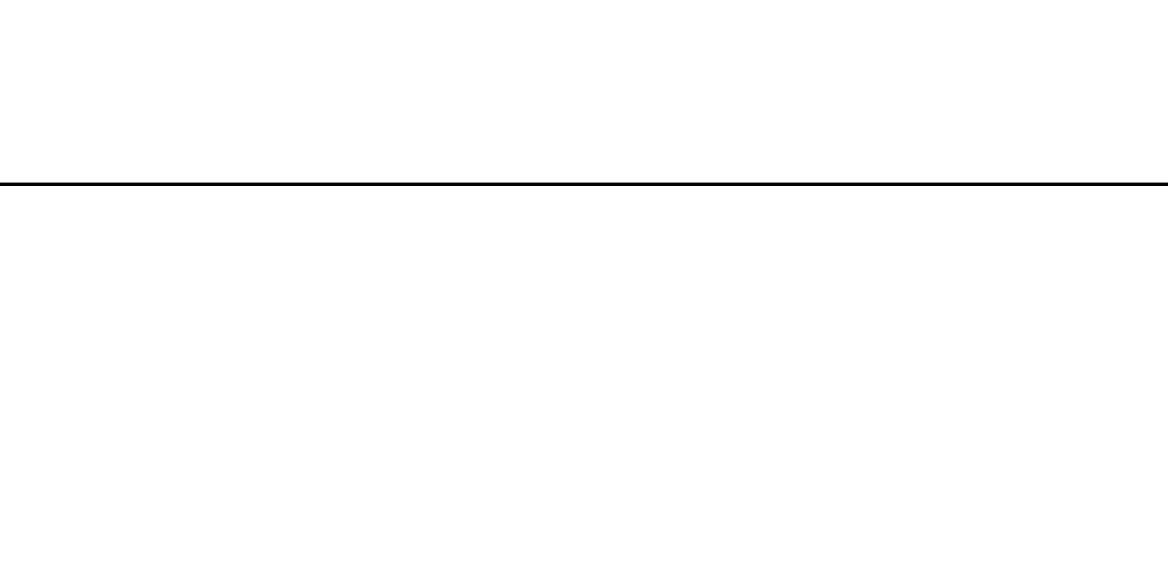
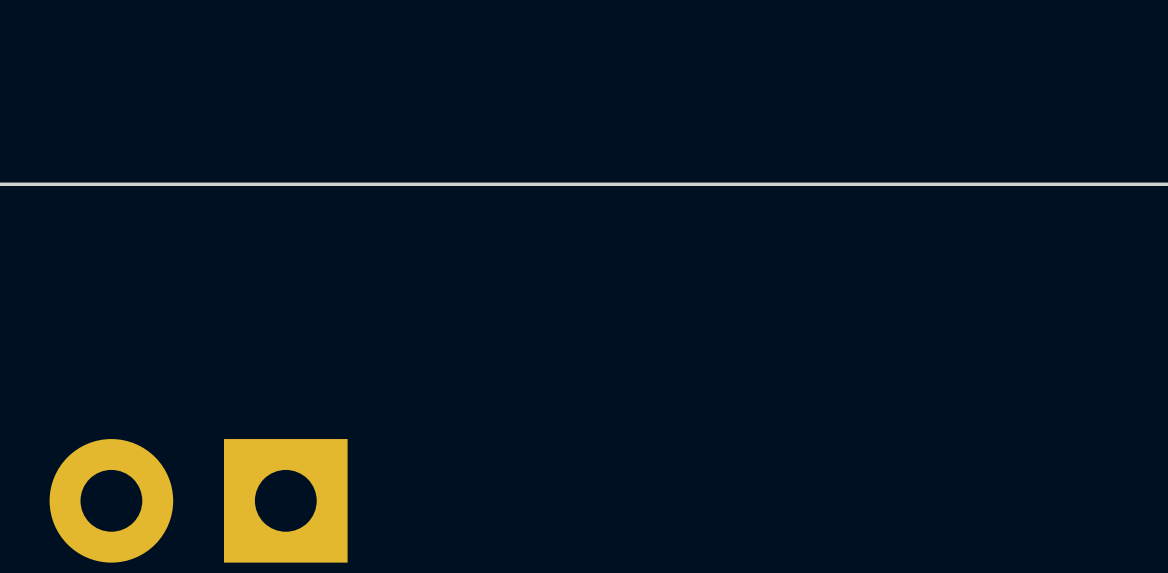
part: none -> (198, 500)

